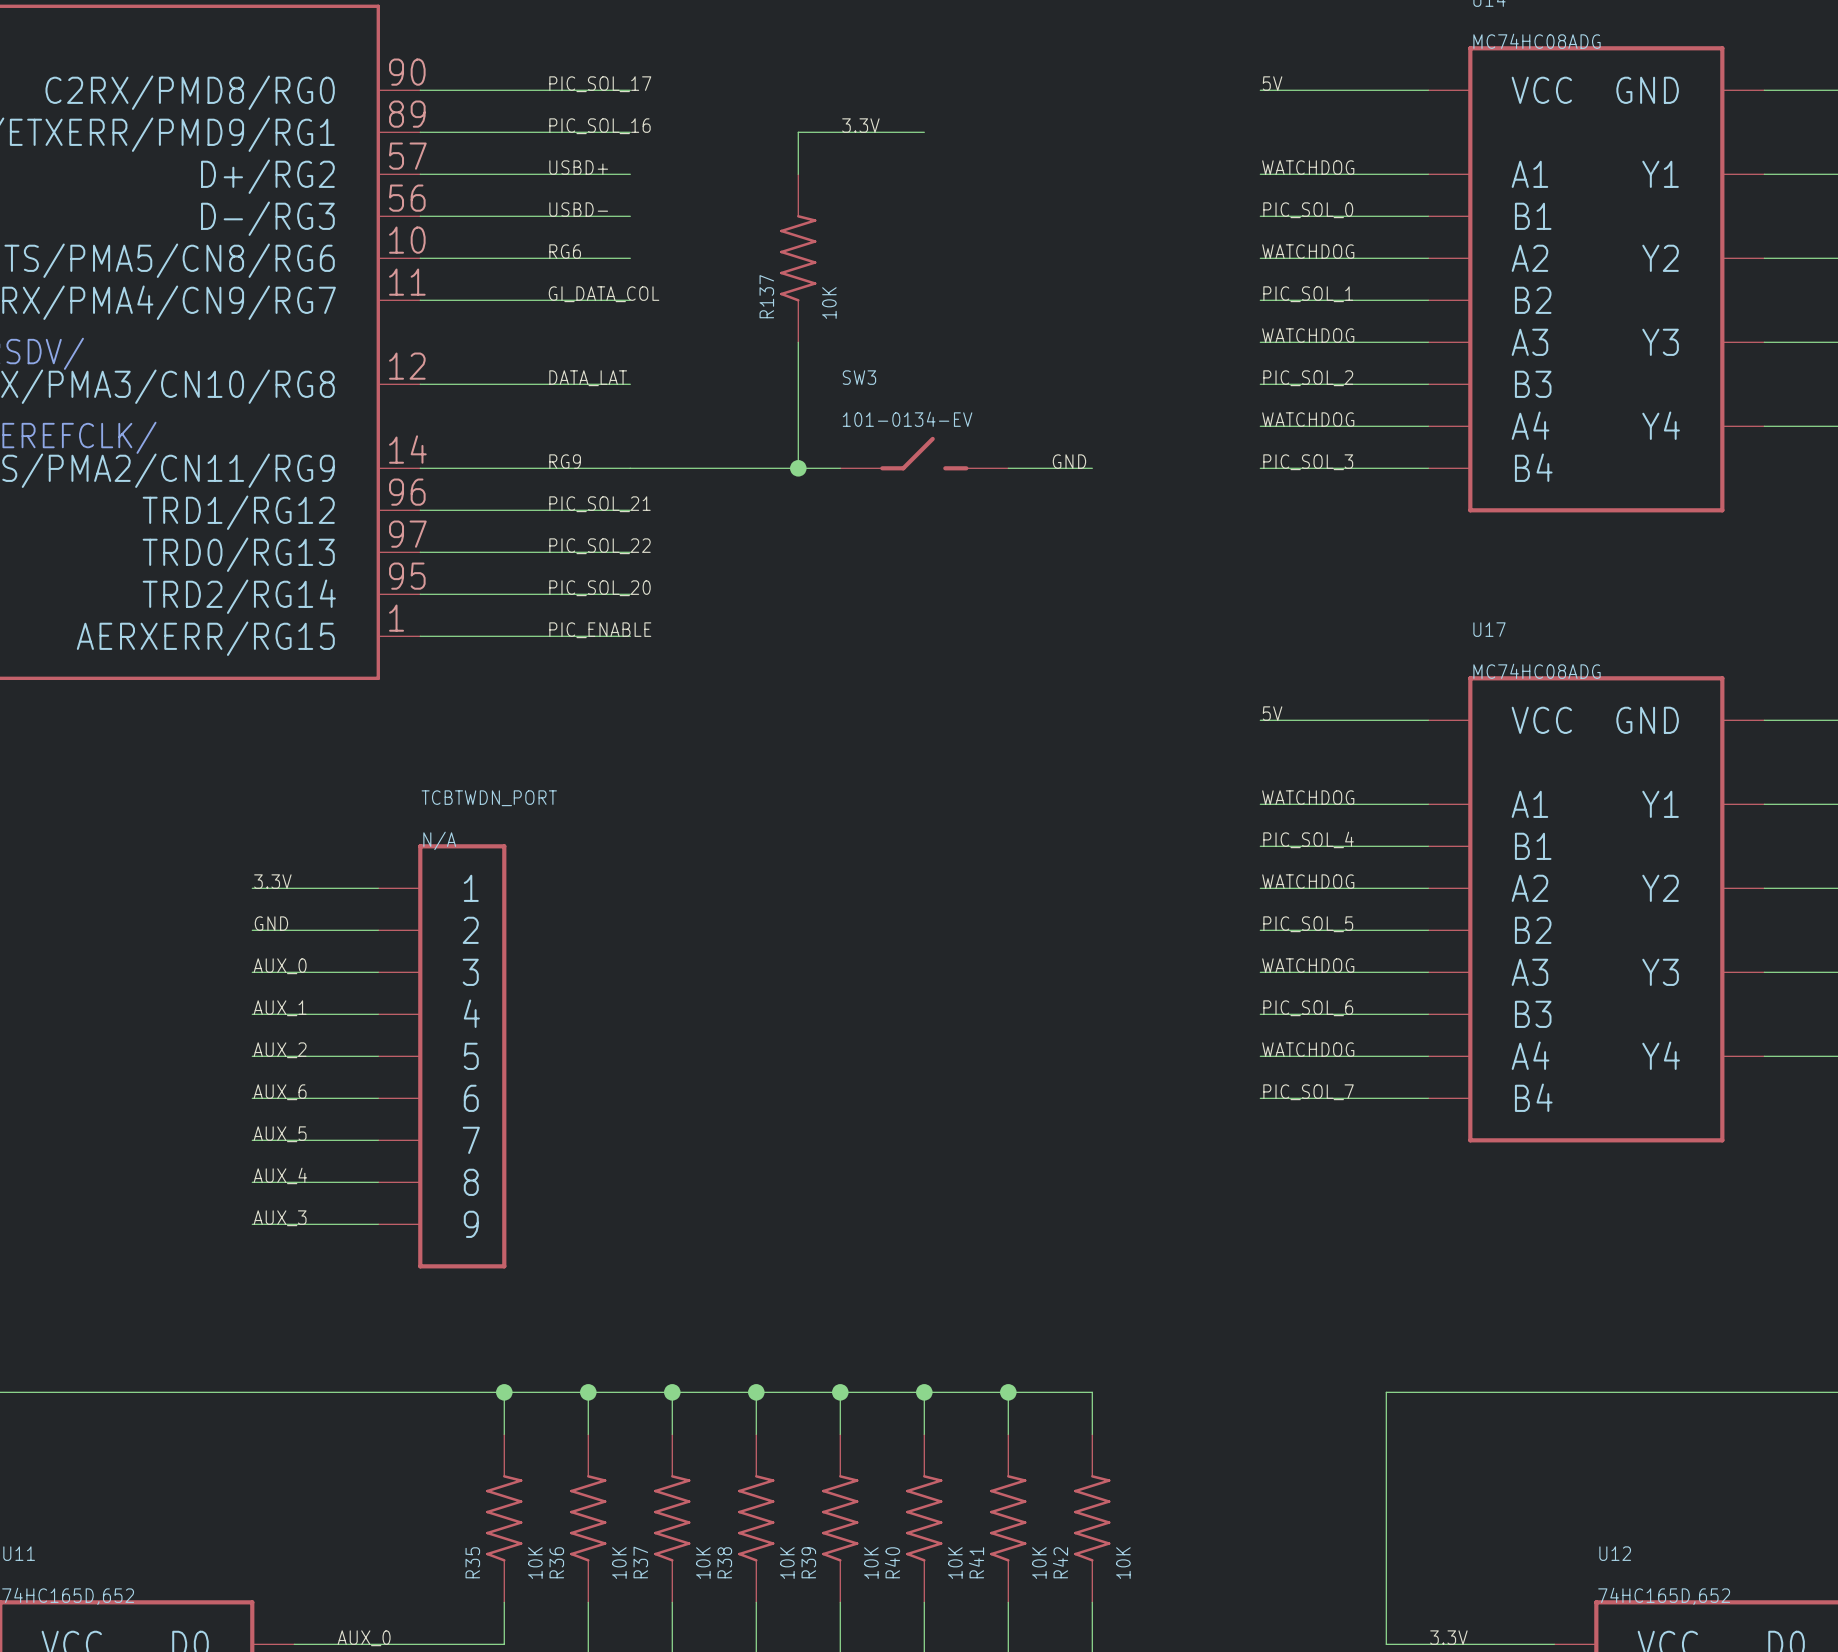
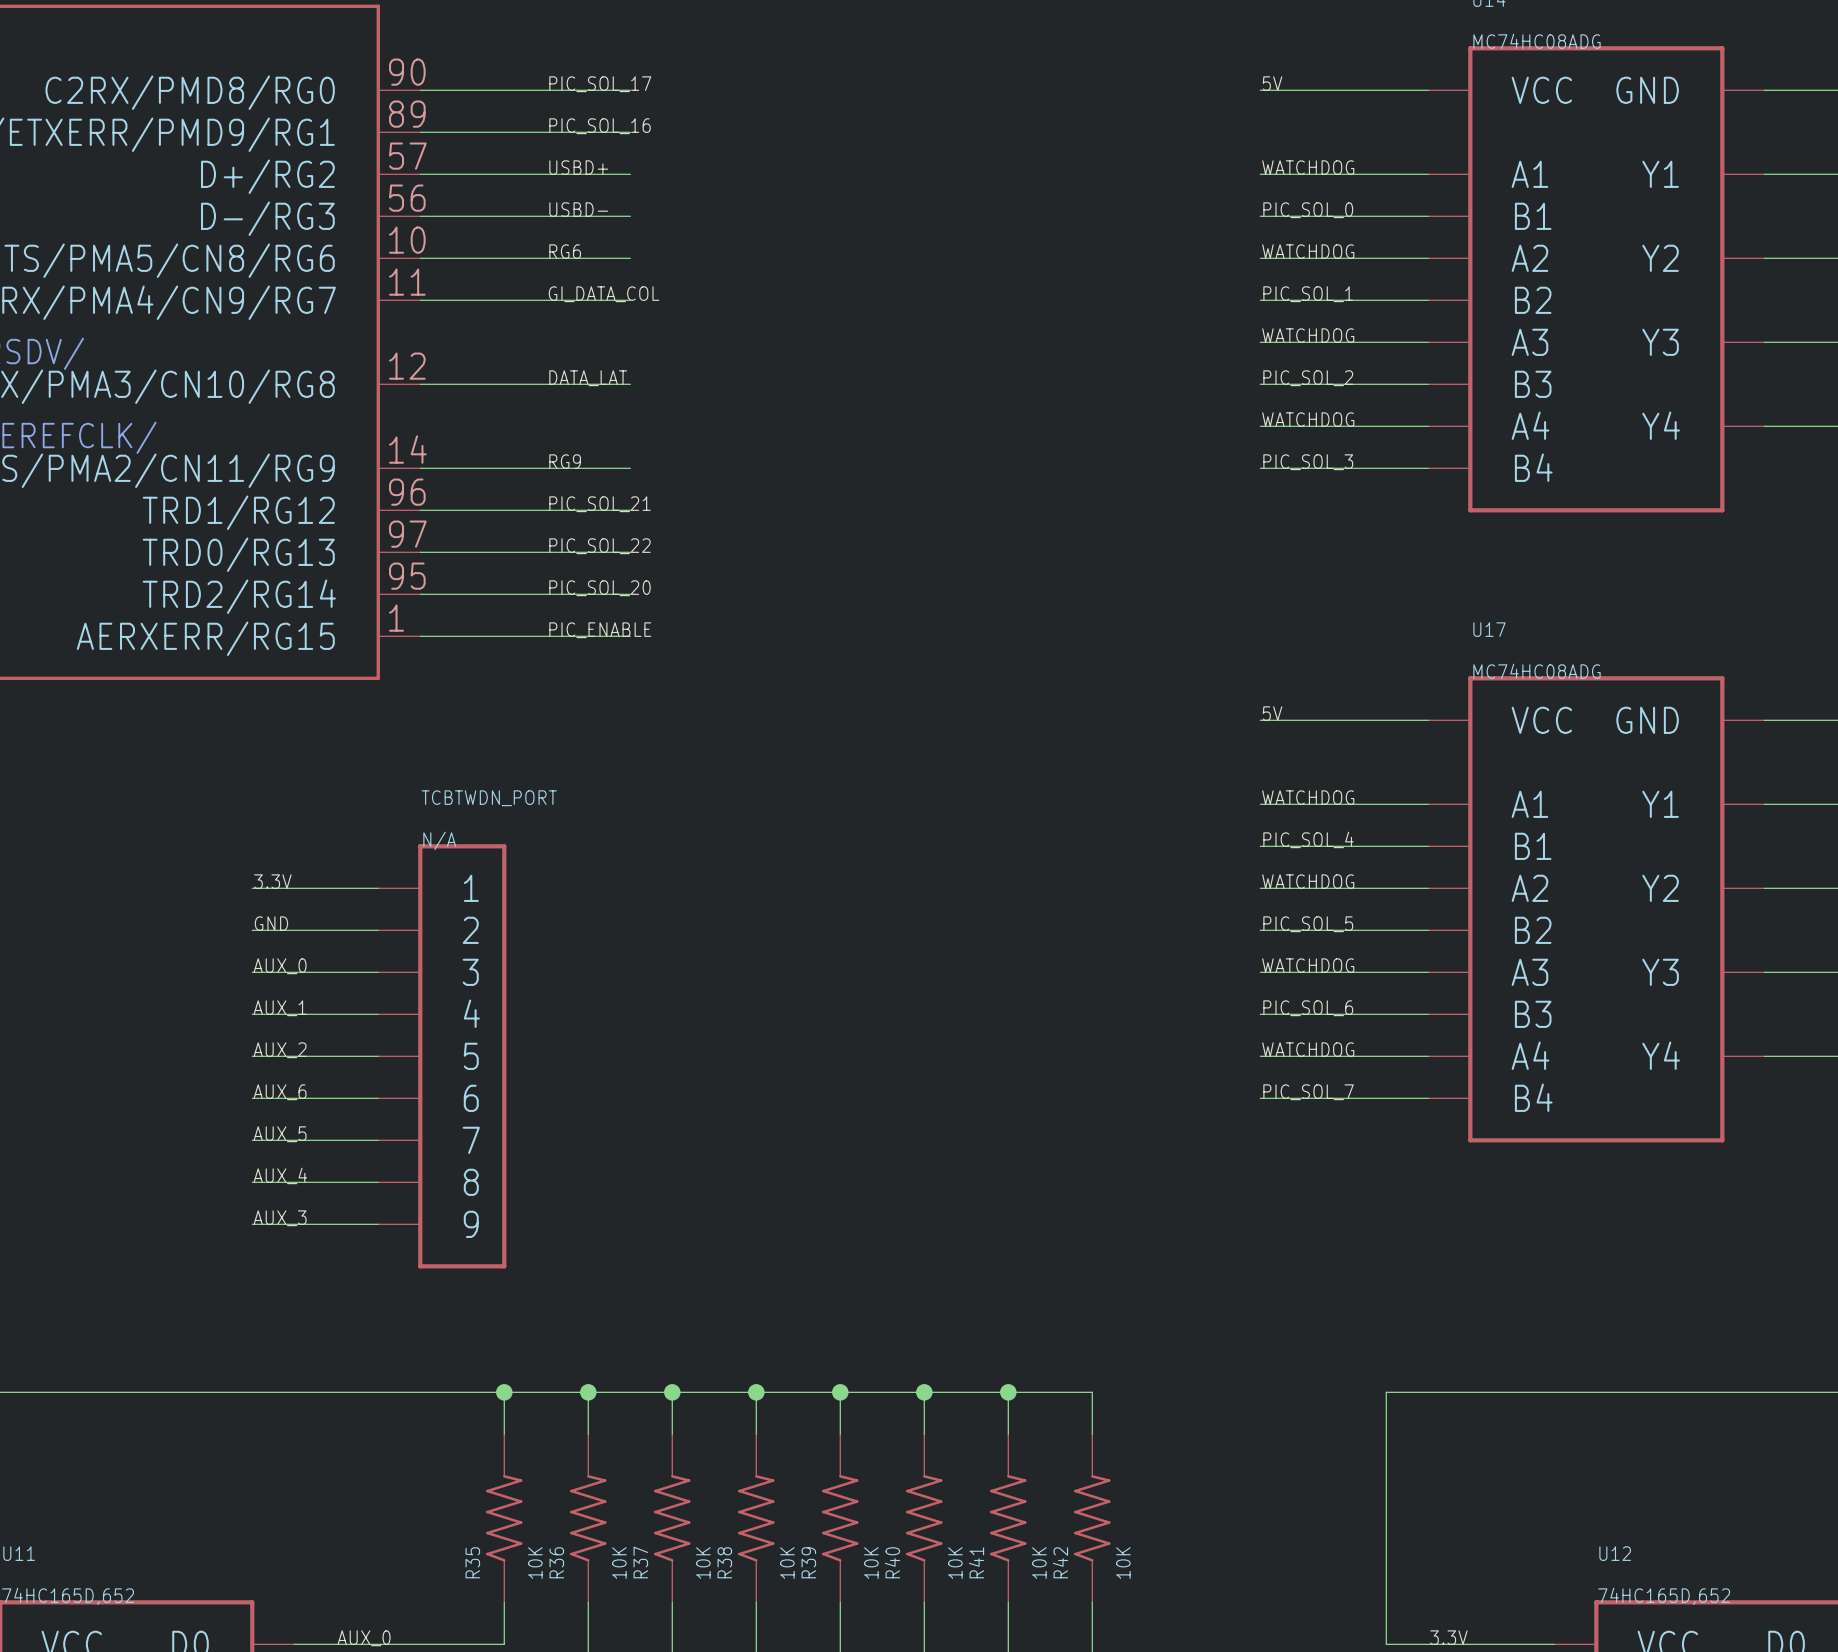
label: 3.3V (860, 125) -> none
wire: (924, 132) (798, 132) (798, 174) -> none
R137: 10K (798, 258) -> none
wire: (798, 342) (798, 468) -> none
SW3: 101-0134-EV (924, 453) -> none
label: GND (1069, 461) -> none
wire: (630, 468) (840, 468) -> none
junction: (798, 468) -> none
wire: (1008, 468) (1092, 468) -> none

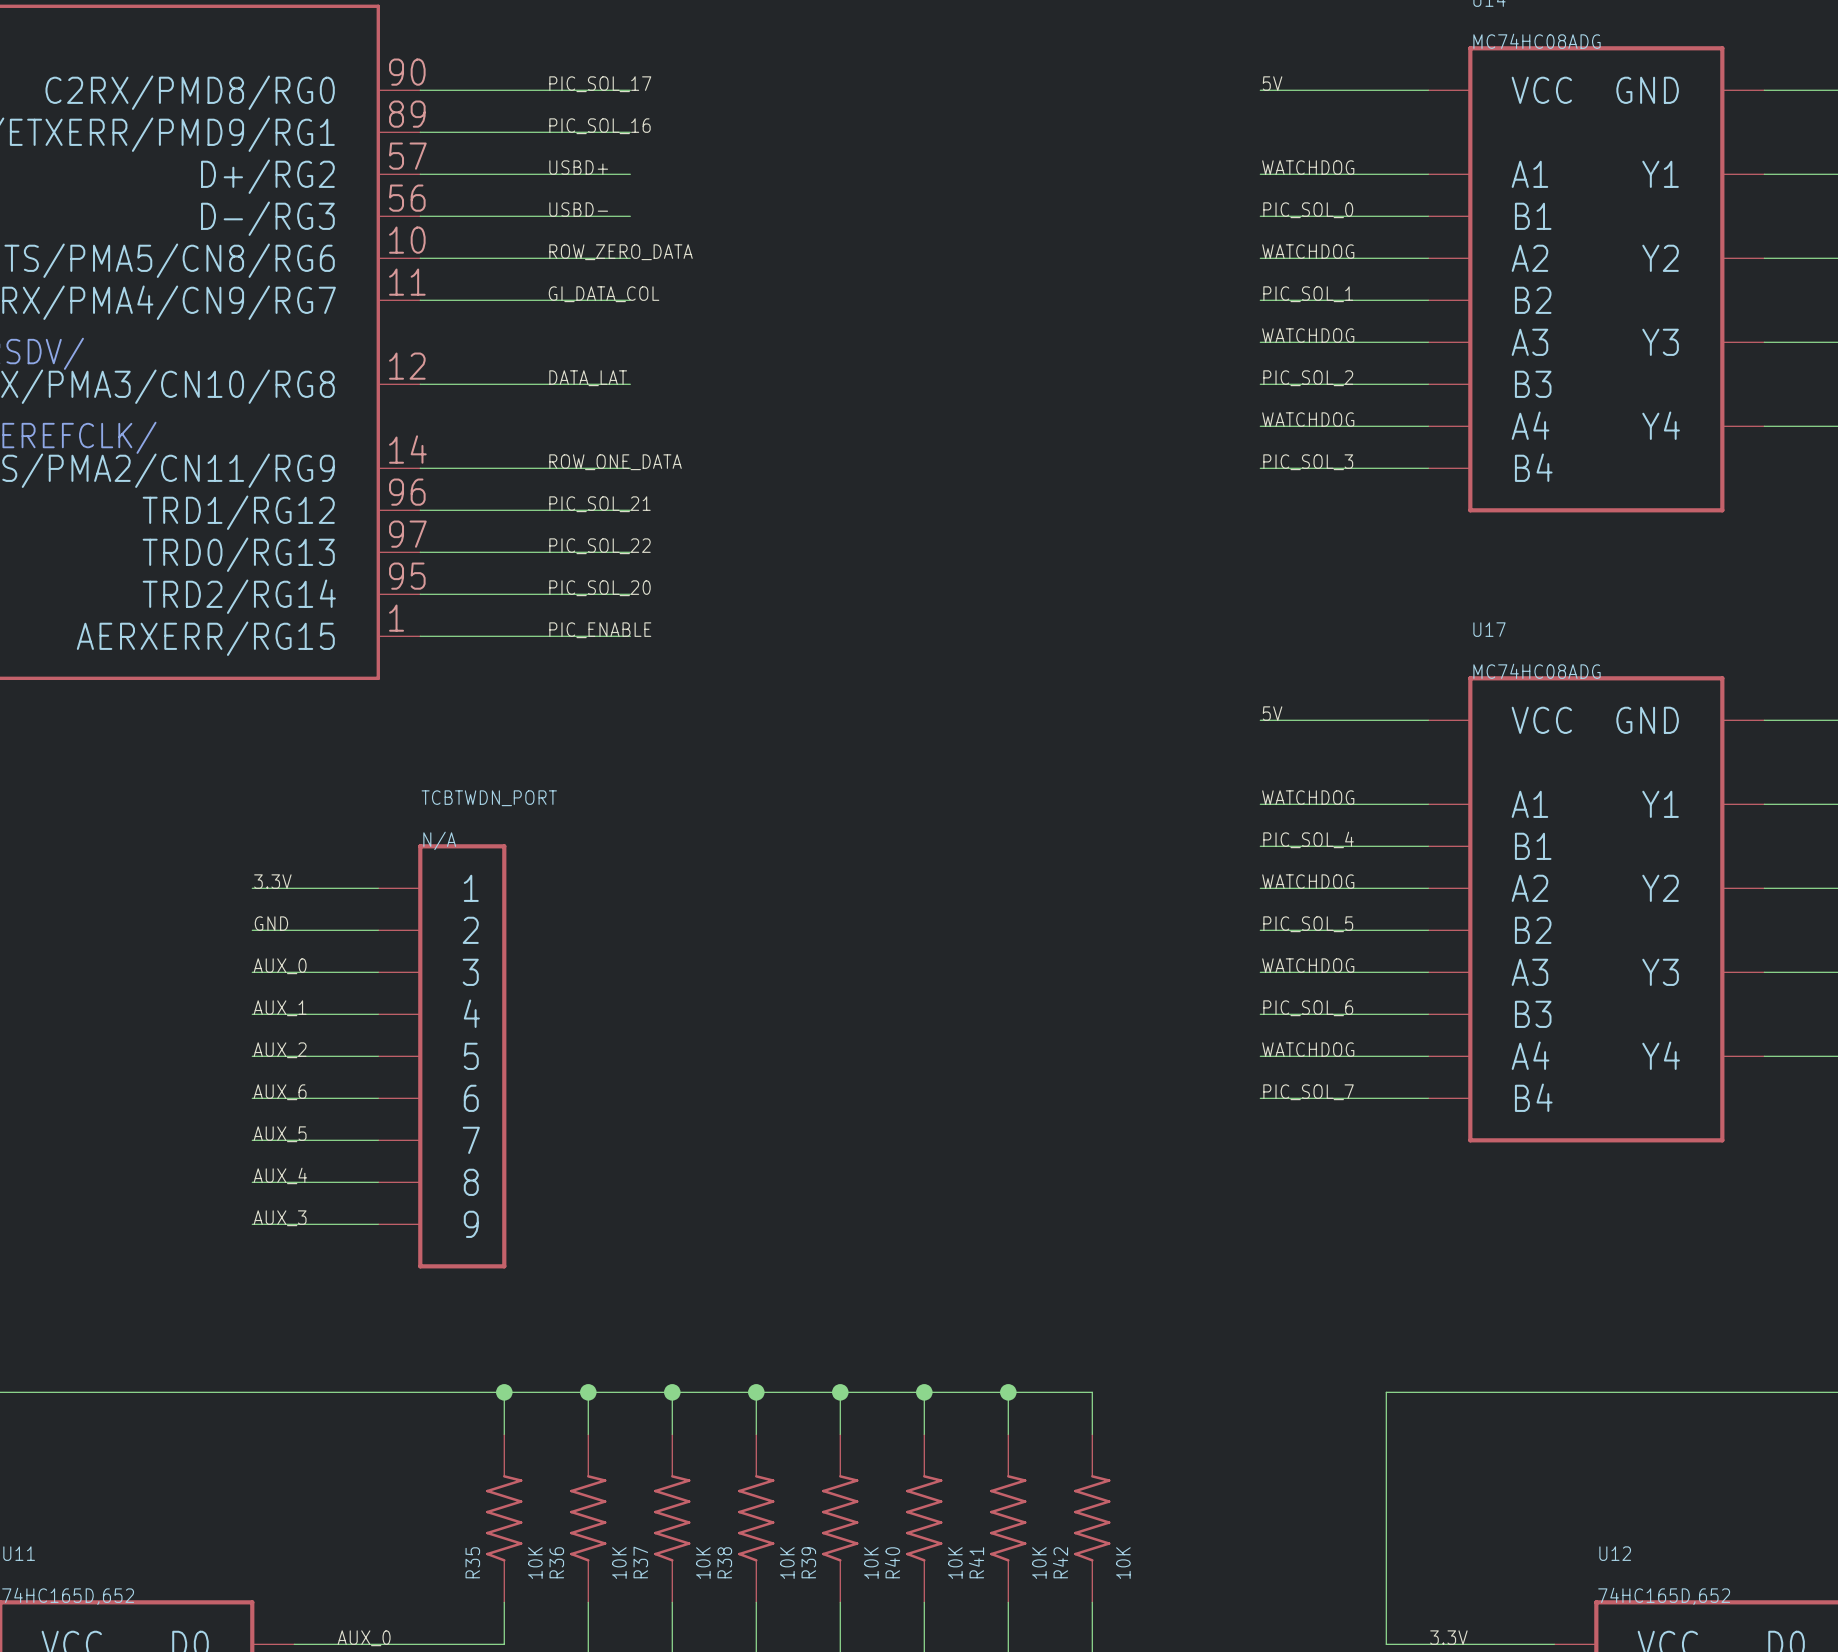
label: RG6 (565, 251) -> ROW_ZERO_DATA (621, 252)
label: RG9 (565, 461) -> ROW_ONE_DATA (615, 462)

